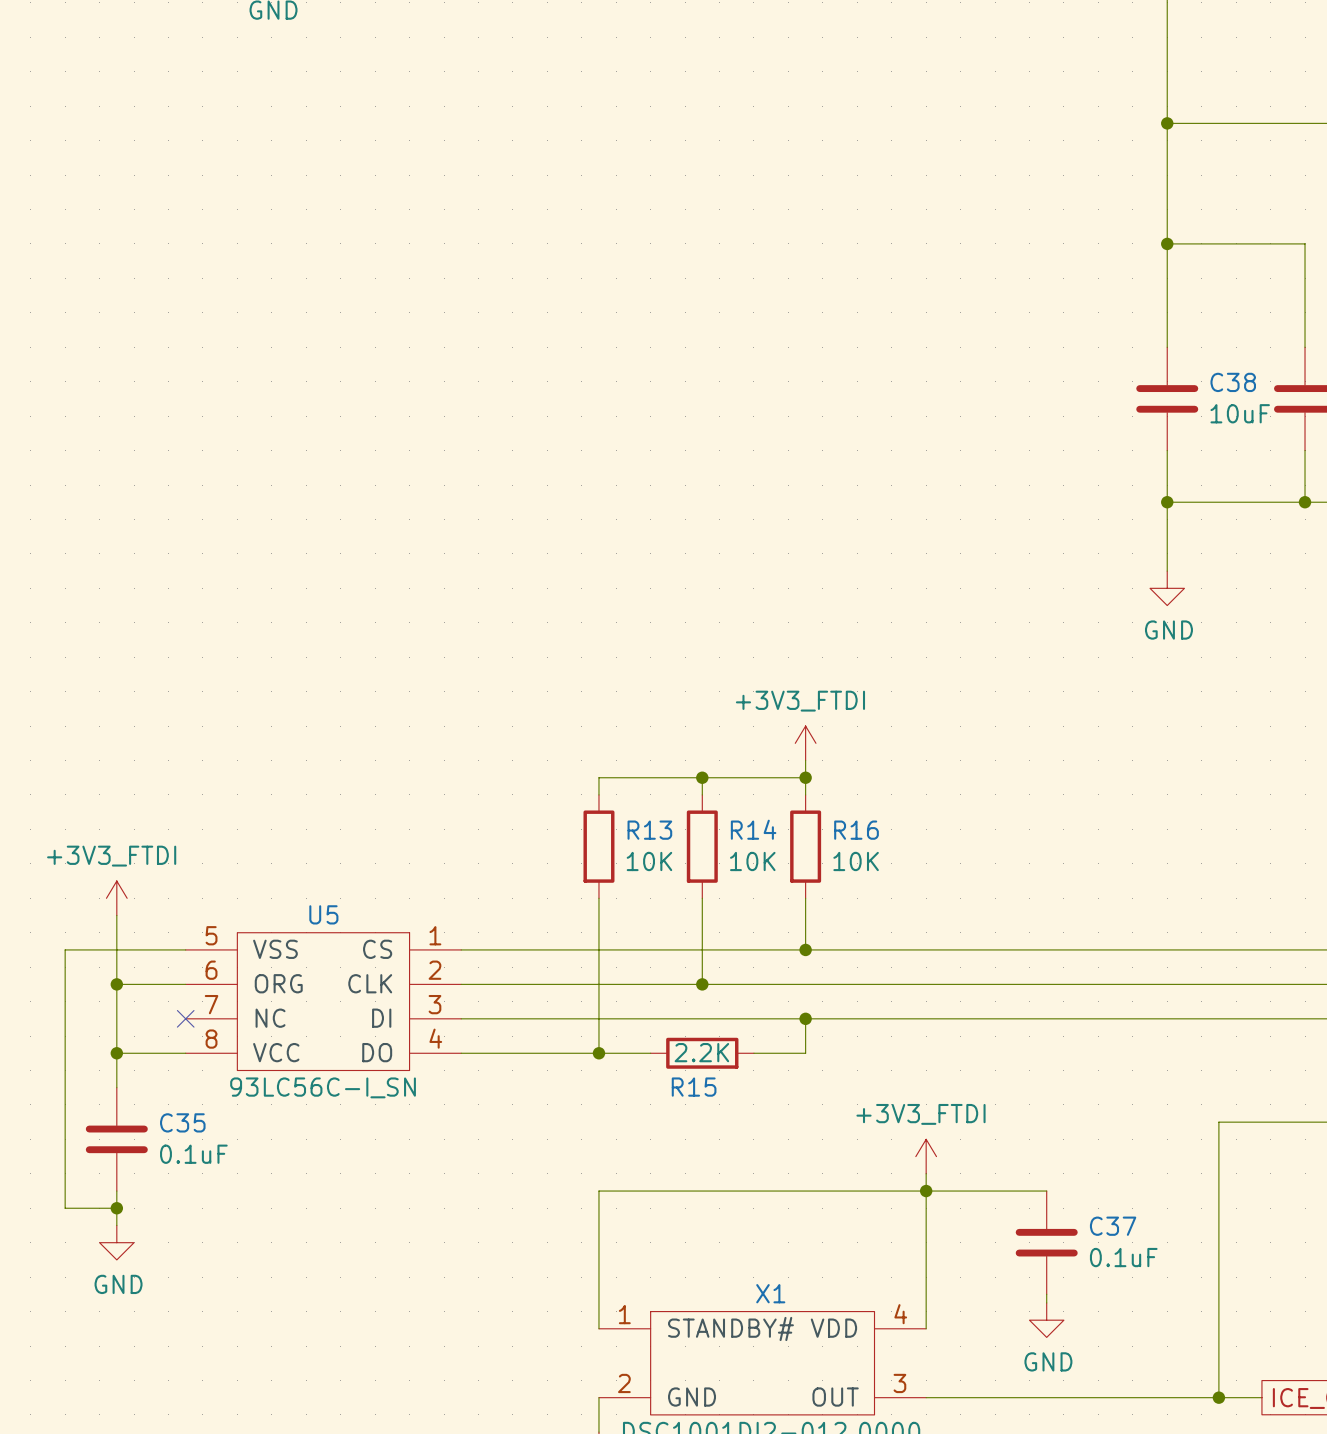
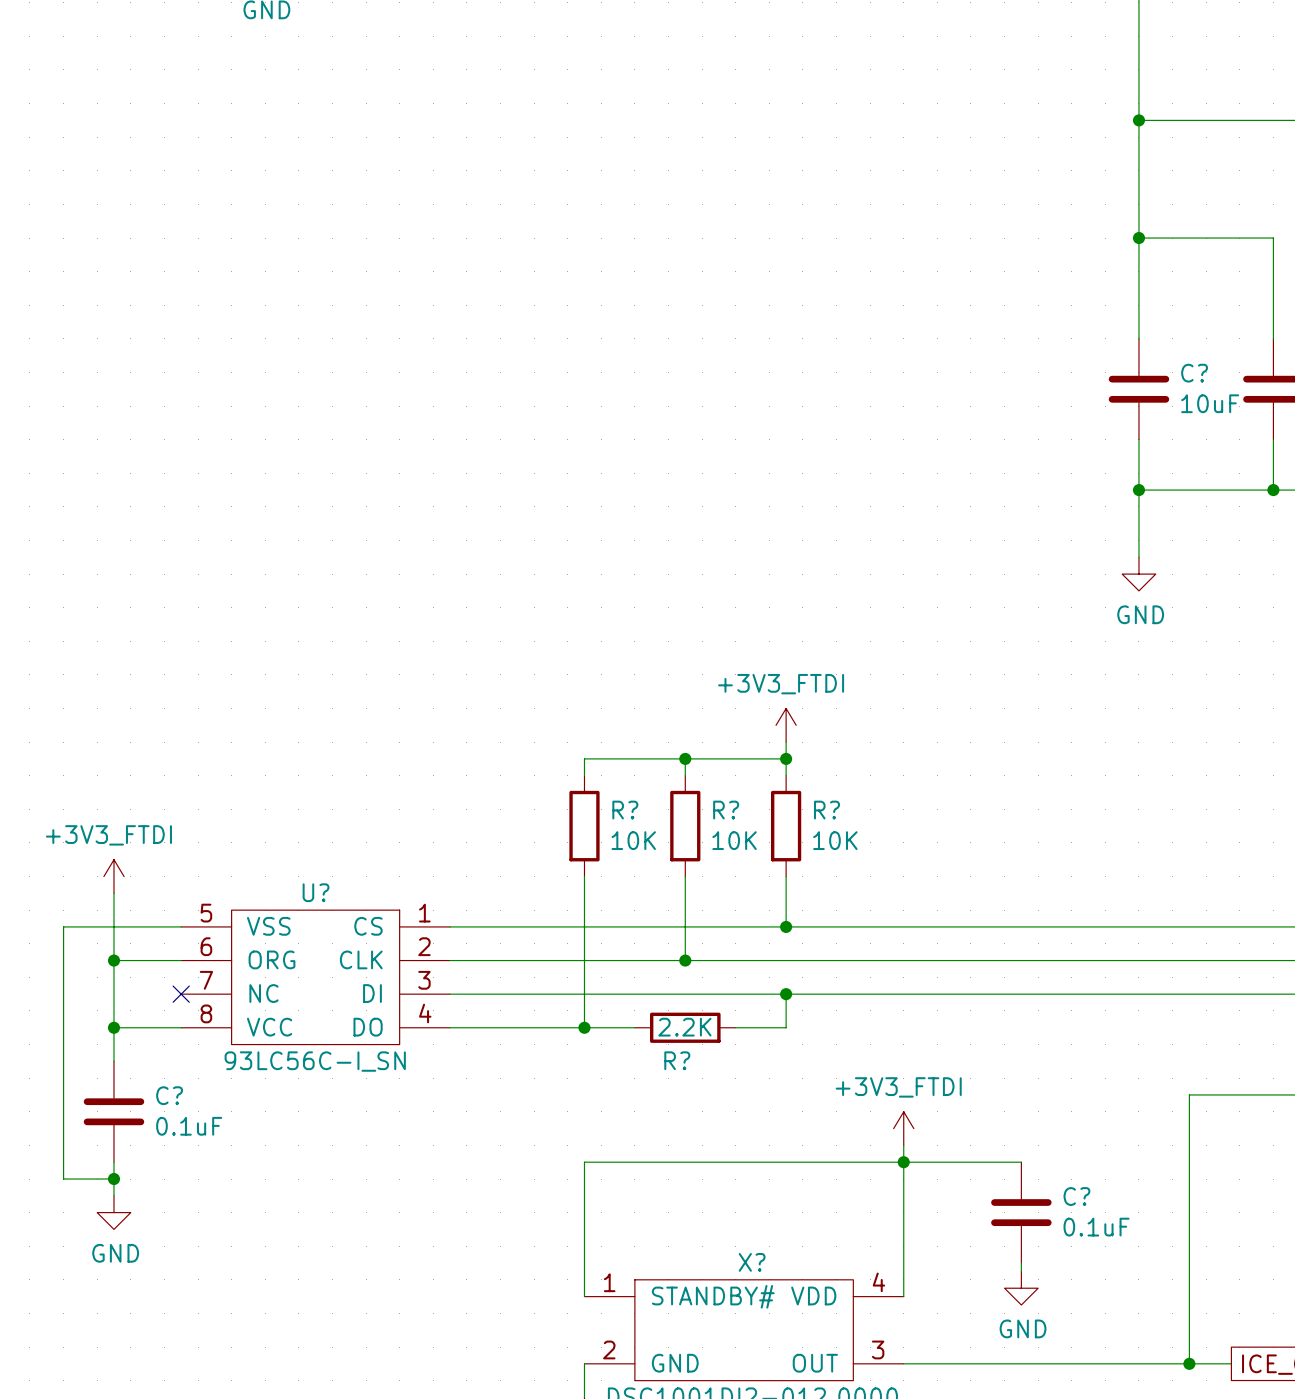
C38 name: C38 (1233, 382) -> C? (1194, 373)
R14 name: R14 (753, 829) -> R? (726, 810)
R13 name: R13 (649, 830) -> R? (625, 810)
R16 name: R16 (856, 830) -> R? (826, 810)
U5 name: U5 (323, 914) -> U? (316, 892)
R15 name: R15 (694, 1087) -> R? (677, 1060)
C35 name: C35 (182, 1122) -> C? (169, 1095)
C37 name: C37 (1113, 1226) -> C? (1076, 1196)
X1 name: X1 (770, 1293) -> X? (752, 1262)

